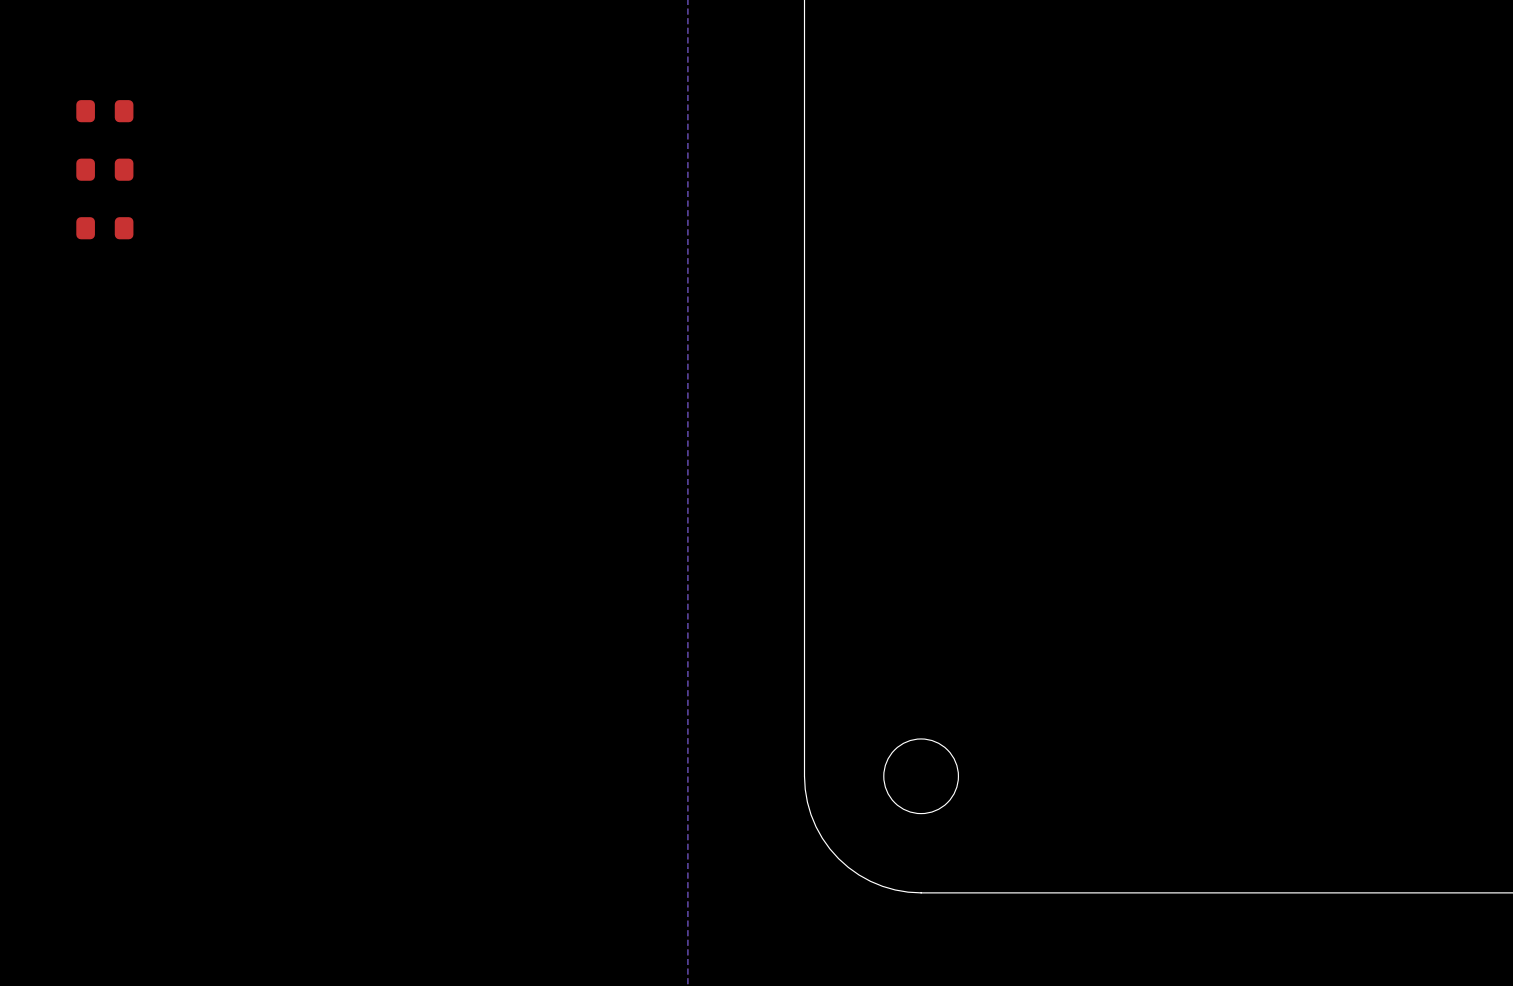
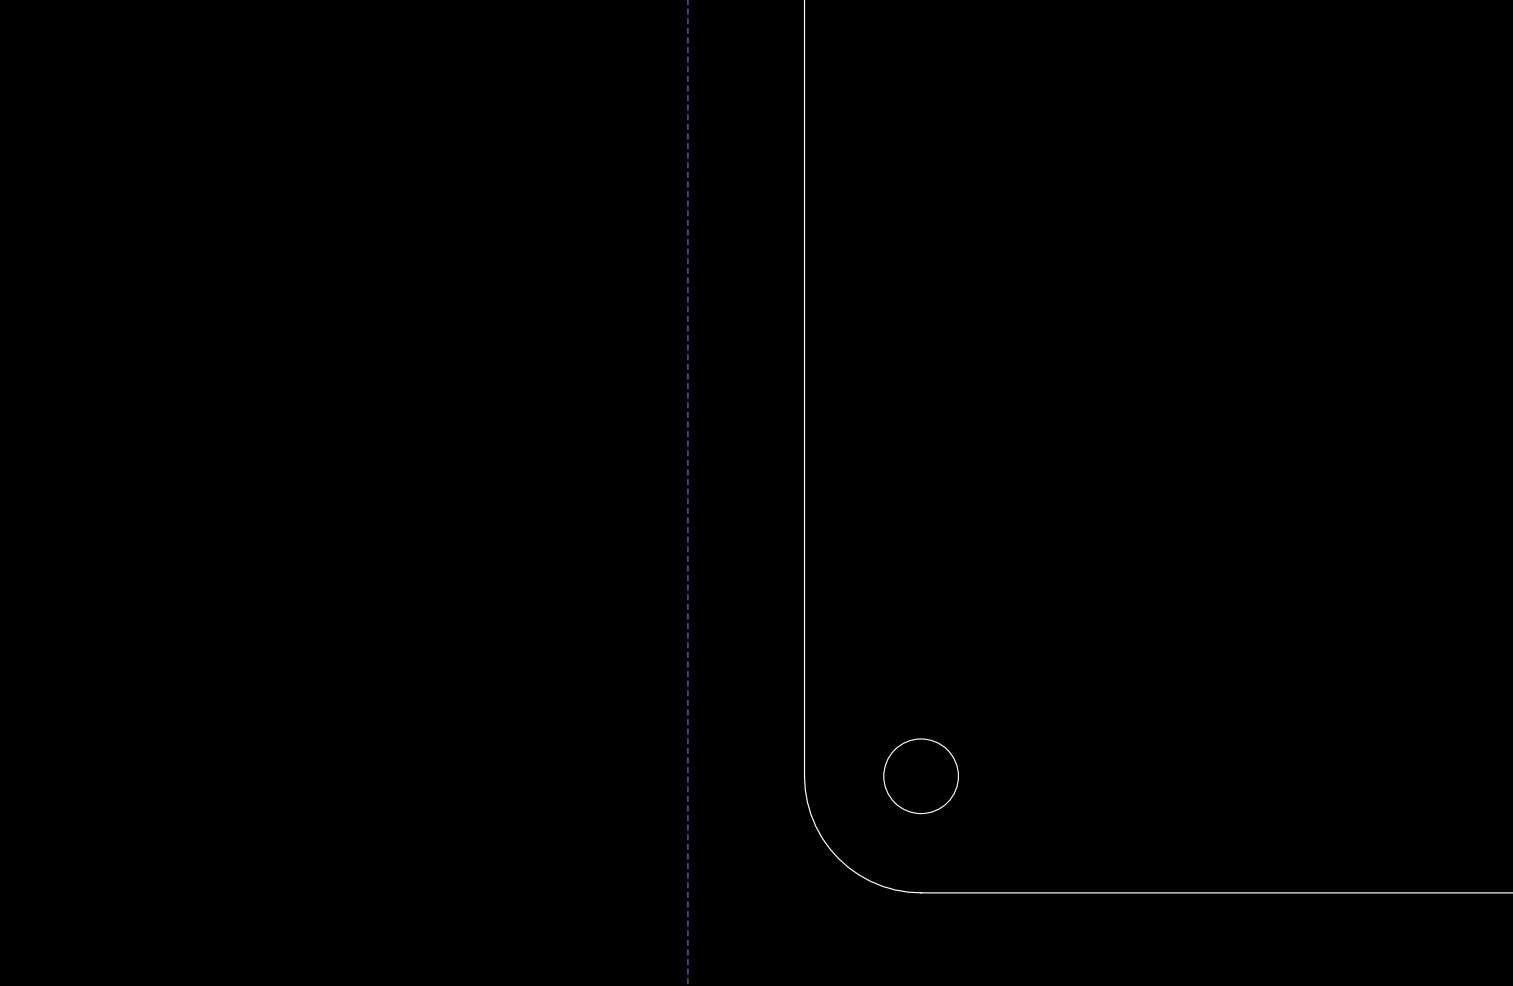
part: (104, 111) -> none
part: (104, 169) -> none
part: (104, 228) -> none

